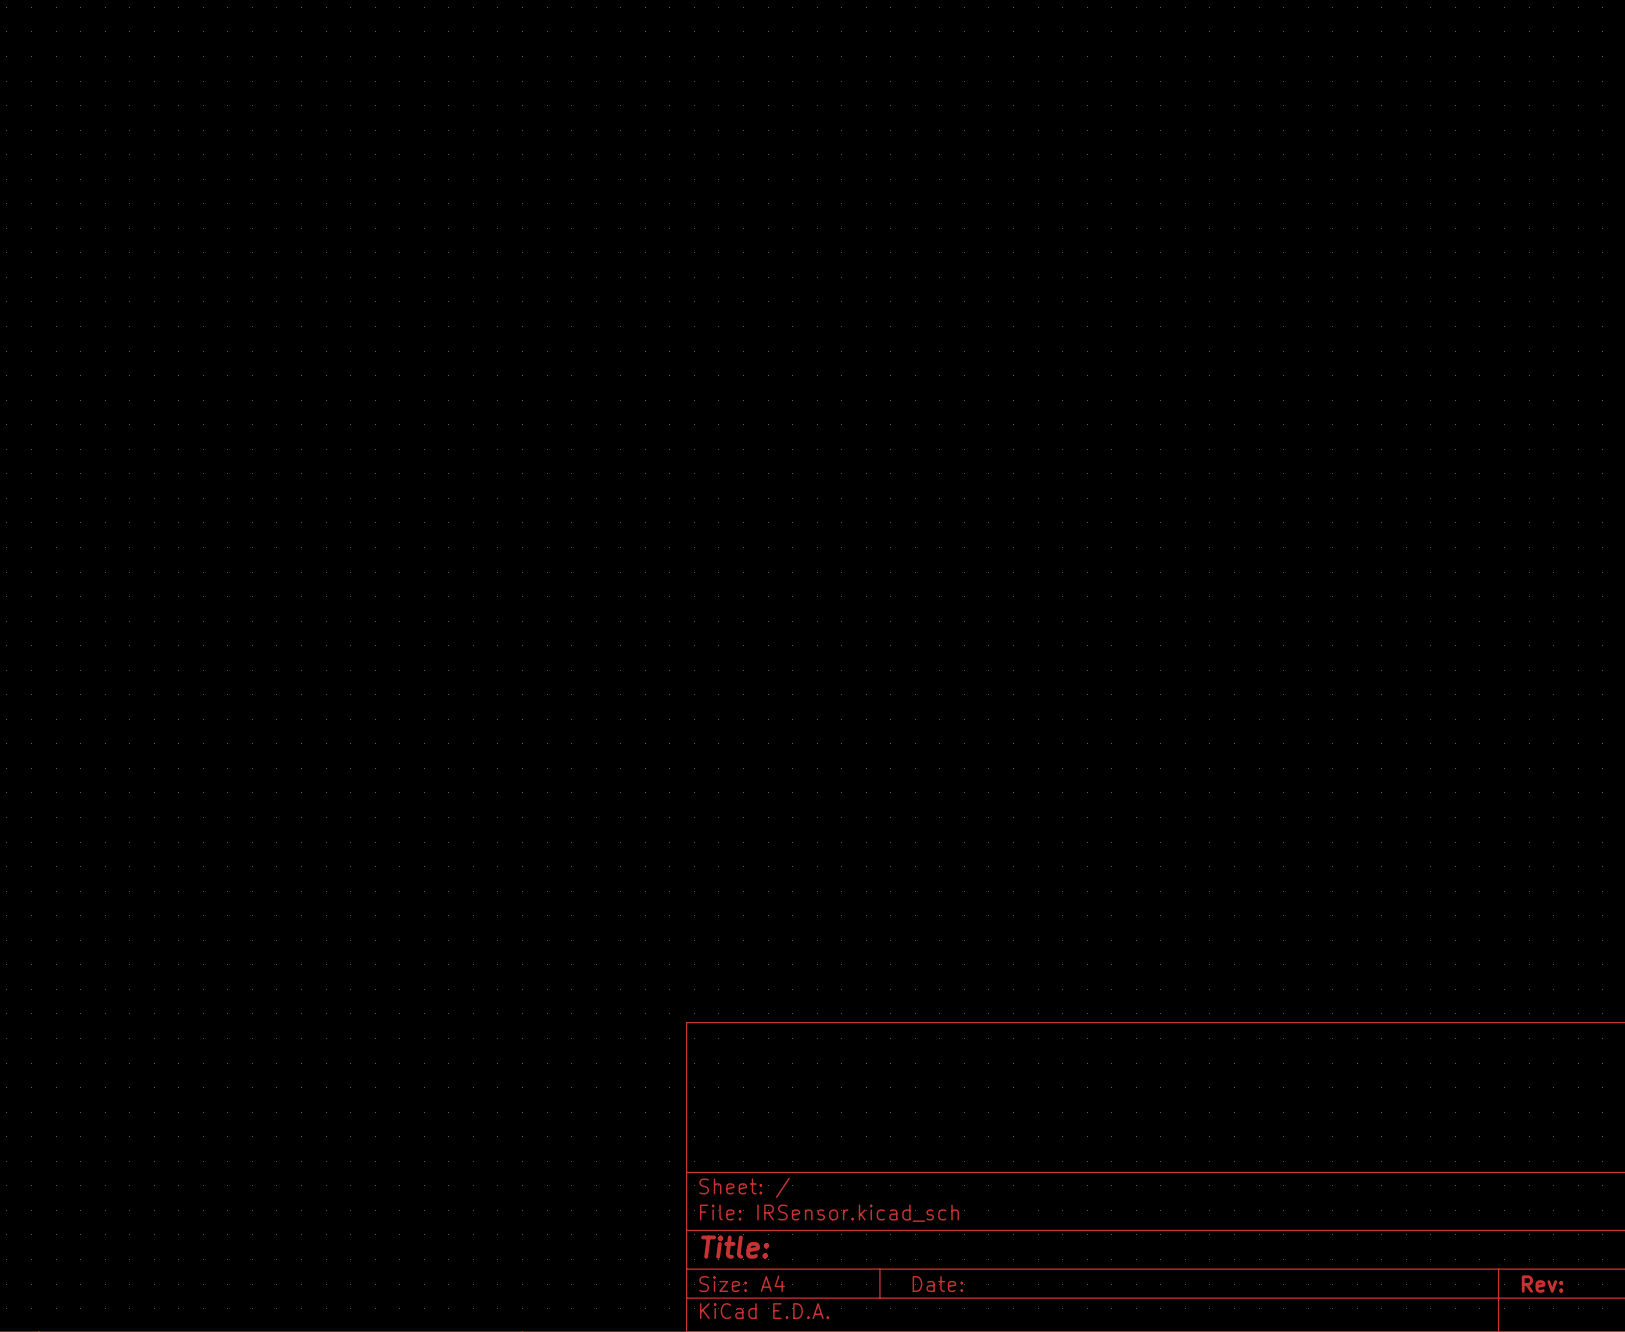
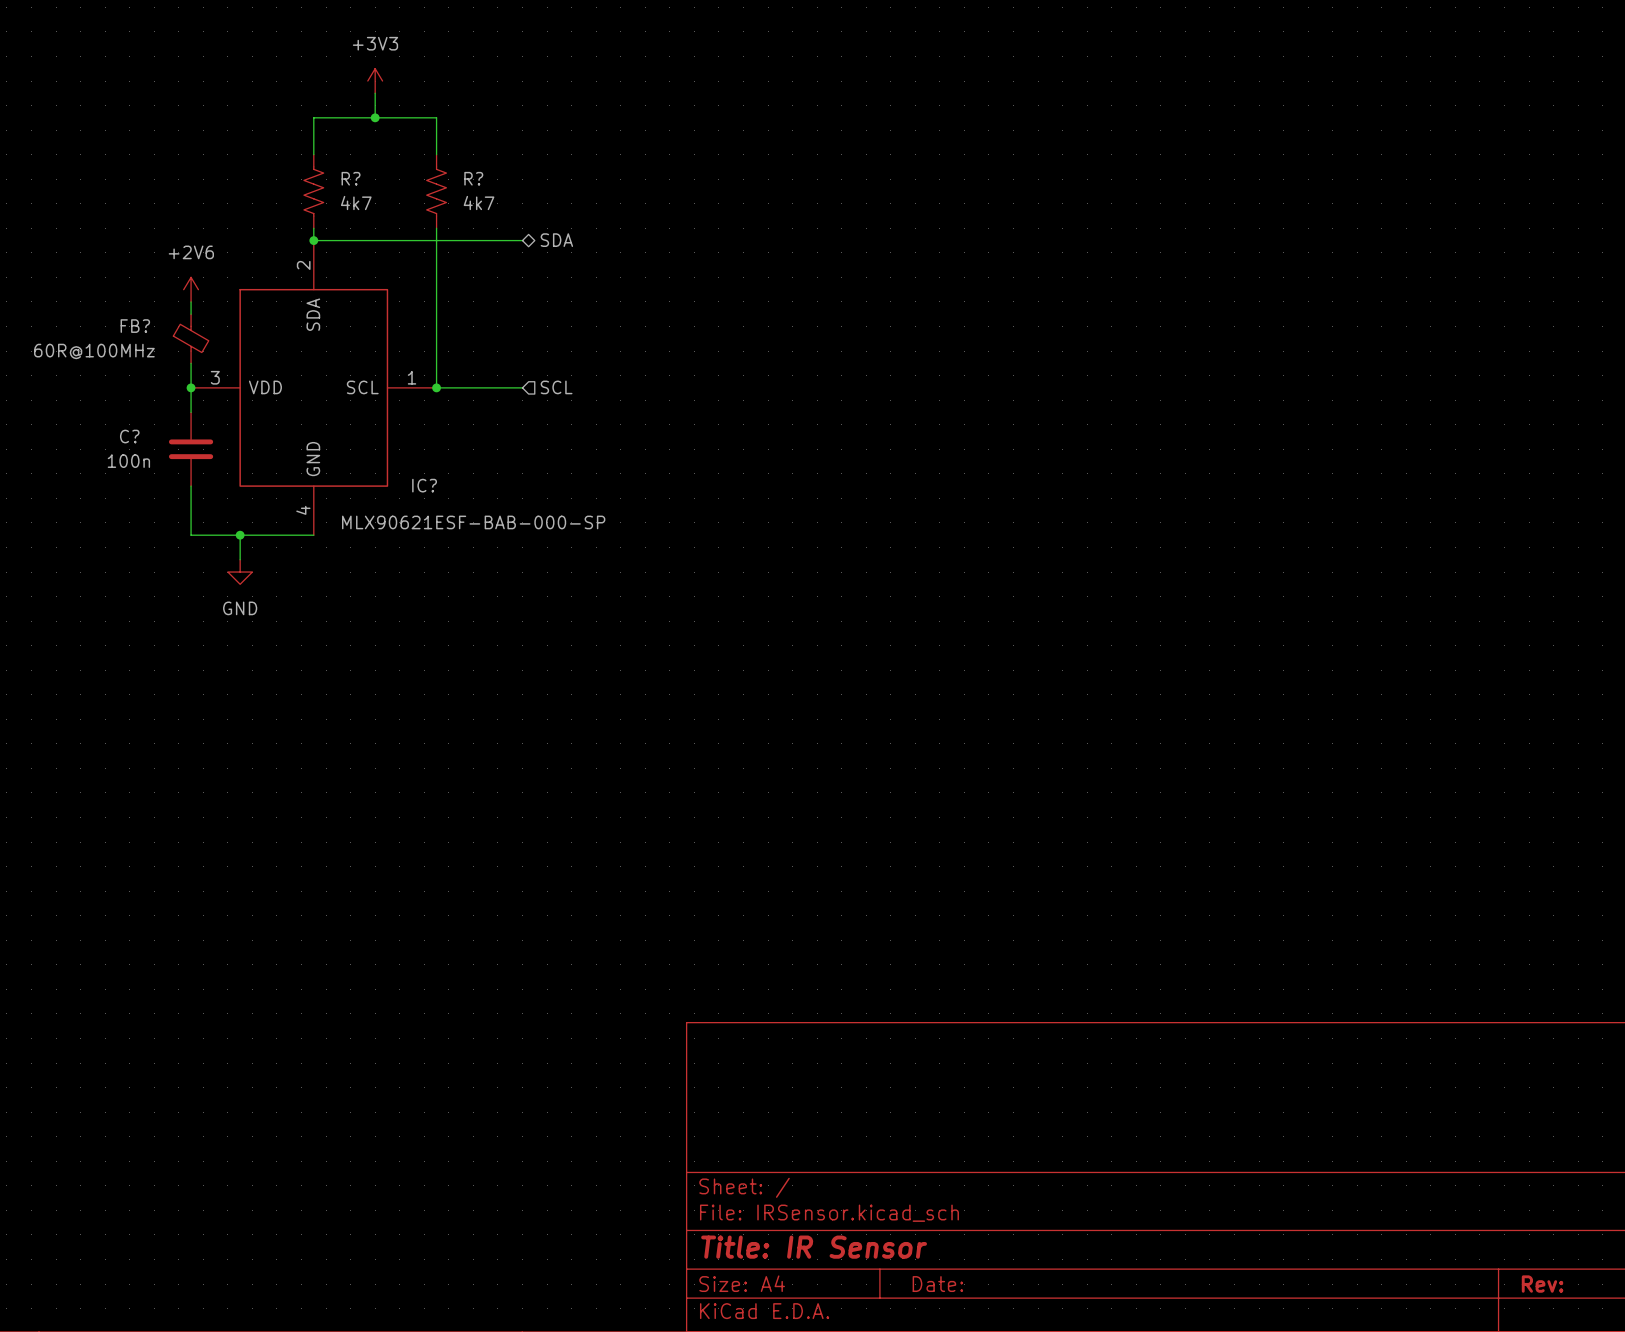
power symbol: none -> +3V3 (375, 81)
wire: none -> (375, 93) (375, 117)
junction: none -> (375, 117)
wire: none -> (313, 154) (313, 117) (436, 117) (436, 154)
R?: none -> 4k7 (313, 191)
R?: none -> 4k7 (436, 191)
wire: none -> (313, 228) (313, 240) (522, 240)
wire: none -> (436, 228) (436, 387) (522, 387)
junction: none -> (313, 240)
hierarchical label: none -> SDA (556, 240)
power symbol: none -> +2V6 (191, 289)
wire: none -> (191, 301) (191, 314)
FB?: none -> 60R@100MHz (191, 338)
wire: none -> (191, 363) (191, 412)
junction: none -> (191, 387)
IC?: none -> MLX90621ESF-BAB-000-SP (313, 387)
junction: none -> (436, 387)
hierarchical label: none -> SCL (556, 387)
C?: none -> 100n (191, 449)
wire: none -> (191, 486) (191, 535) (313, 535)
wire: none -> (240, 535) (240, 559)
junction: none -> (240, 535)
power symbol: none -> GND (240, 572)
title block: Title: (735, 1247) -> Title: IR Sensor (814, 1247)

